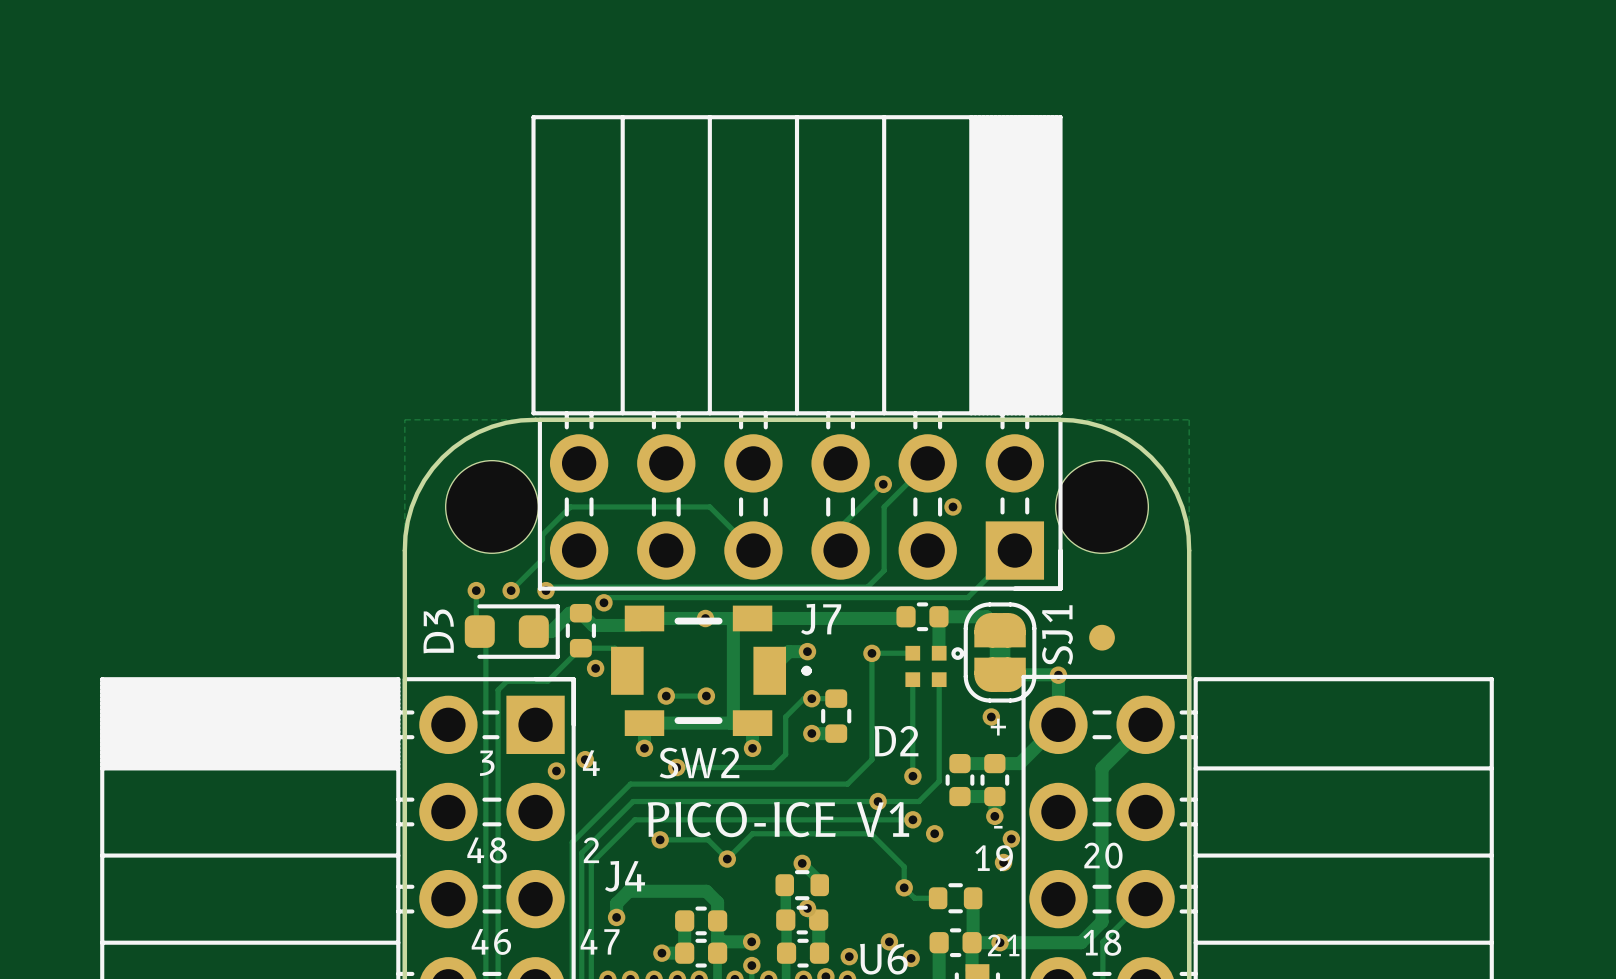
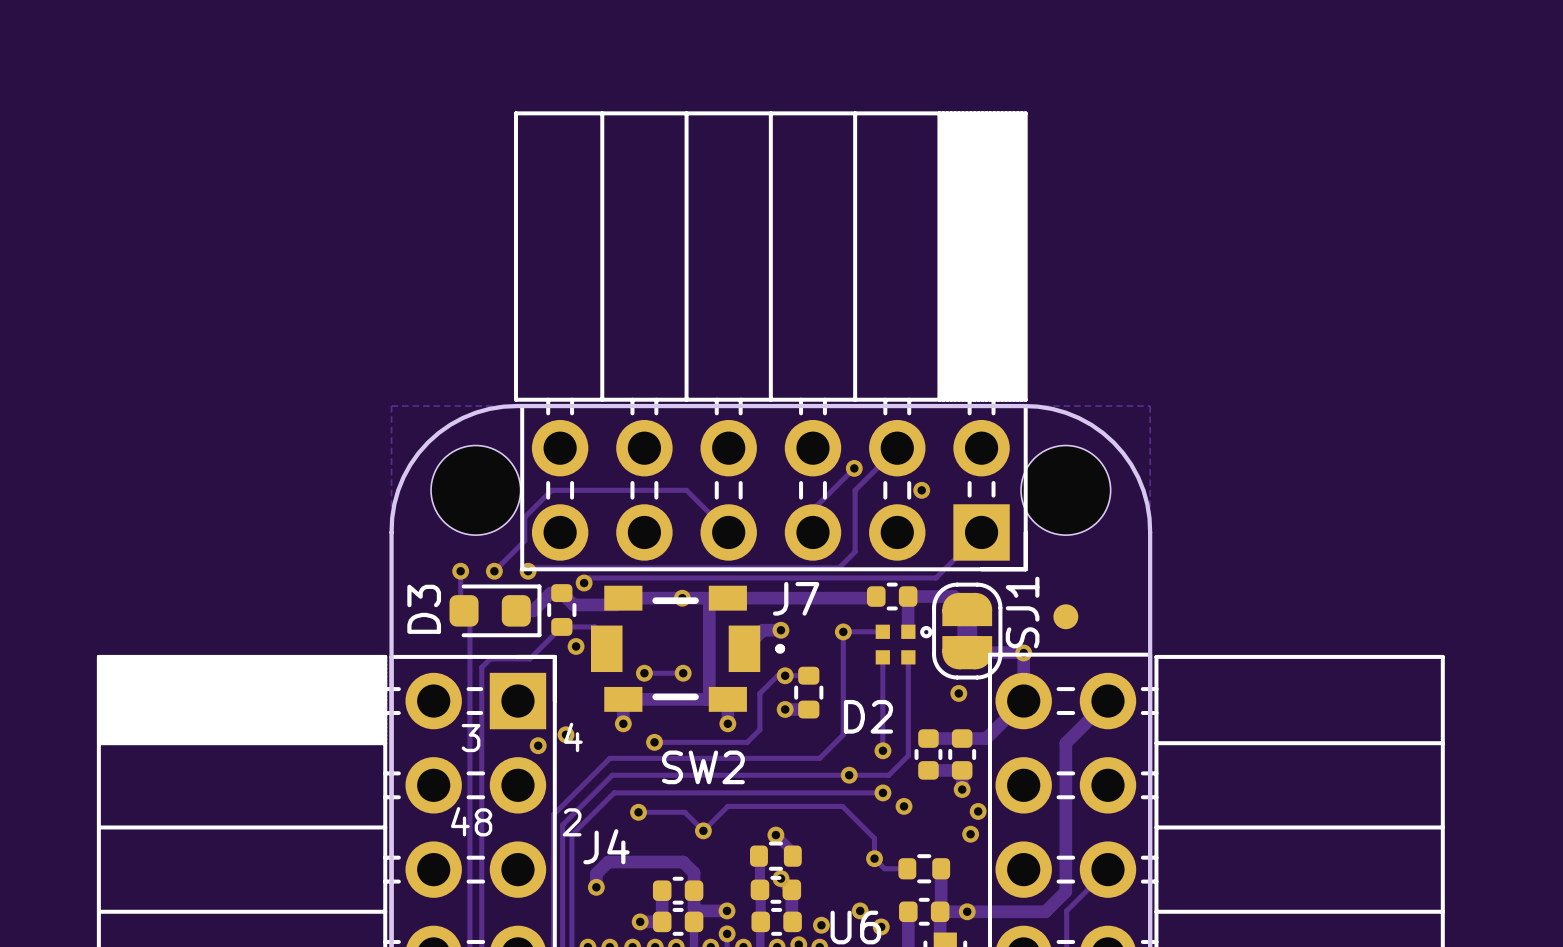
text: + (998, 727) -> none
SW2 name position: SW2 (699, 763) -> SW2 (703, 767)
text: PICO-ICE V1 (778, 819) -> none
text: - (998, 827) -> none
text: 20 (1103, 855) -> none
text: 19 (994, 858) -> none
text: 46 (491, 941) -> none
text: 47 (600, 941) -> none
text: 18 (1102, 942) -> none
text: 21 (1003, 945) -> none

